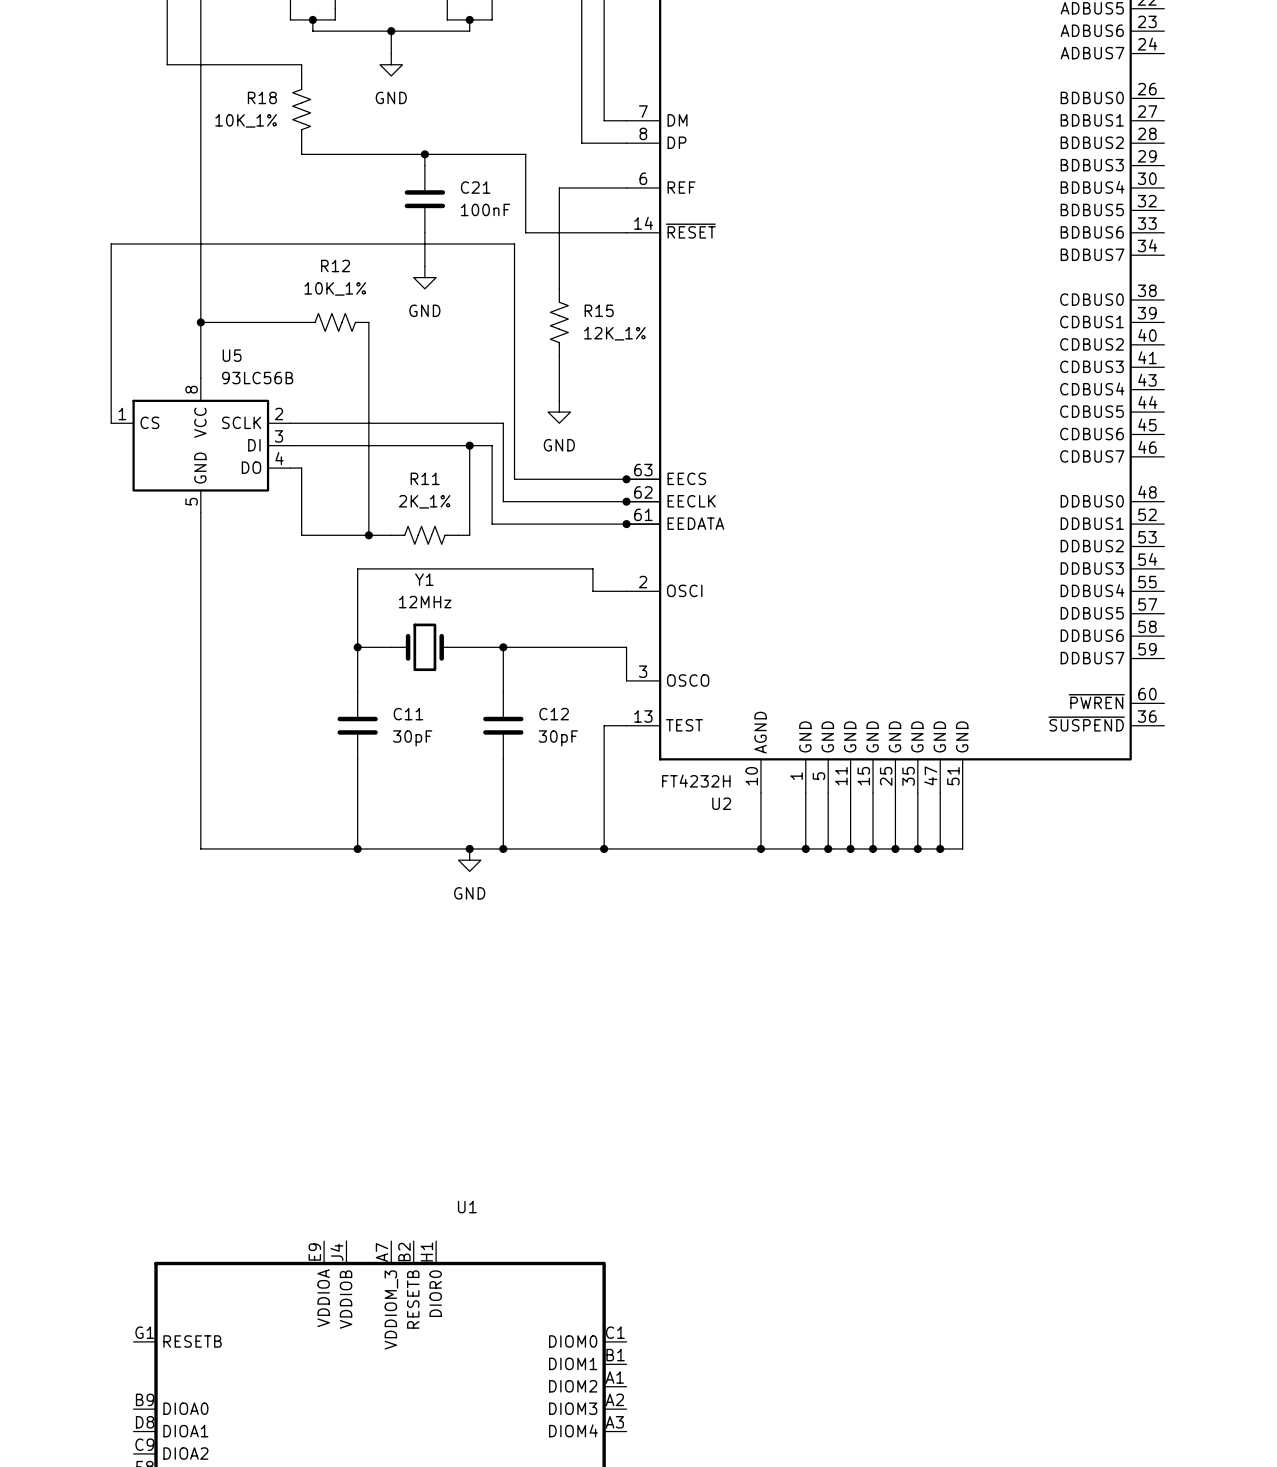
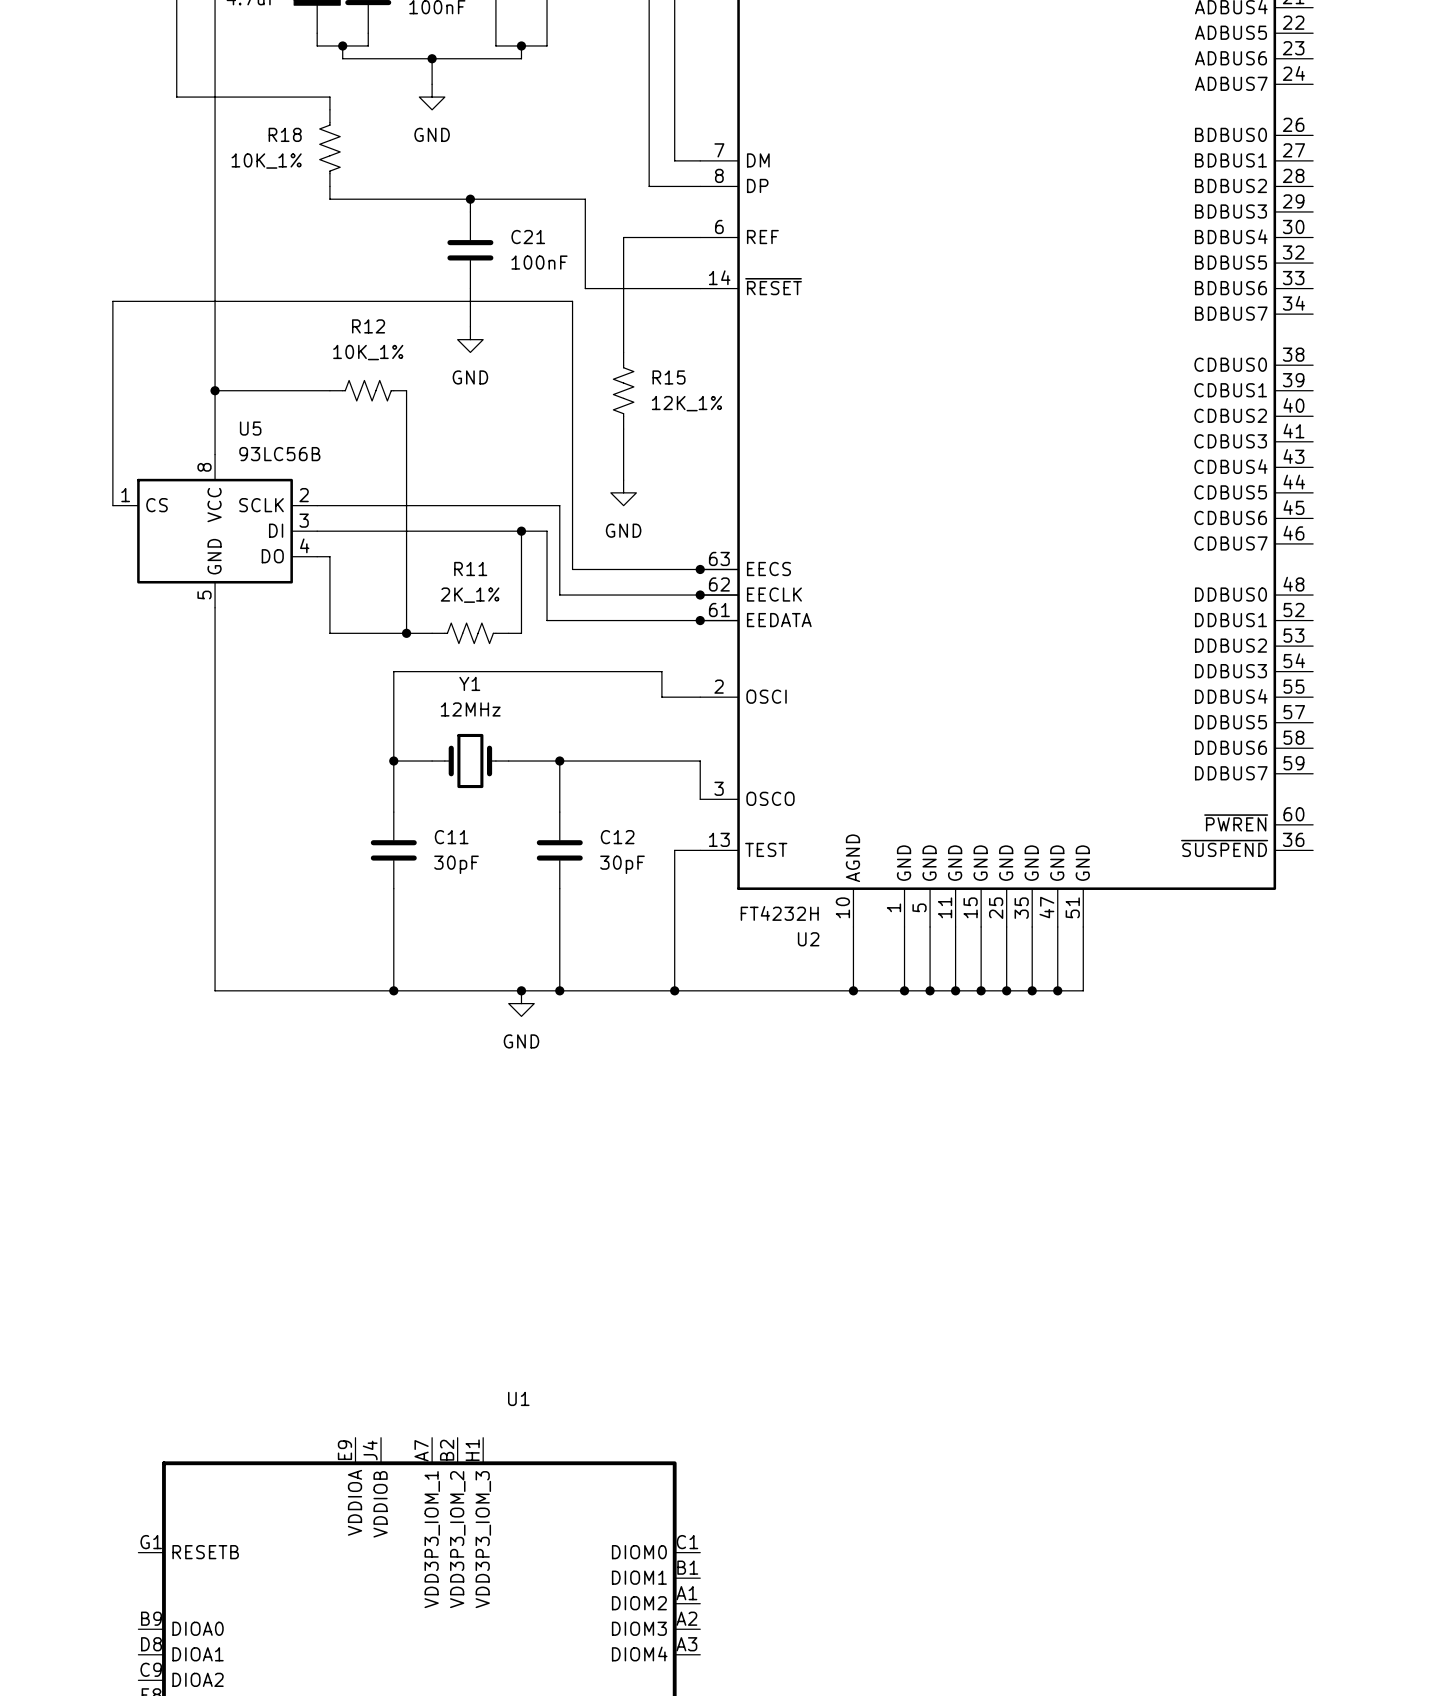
U1 pin name: DIOR0 (435, 1293) -> VDD3P3_IOM_3 (483, 1539)
U1 pin name: RESETB (413, 1299) -> VDD3P3_IOM_2 (457, 1539)
U1 pin name: VDDIOM_3 (391, 1309) -> VDD3P3_IOM_1 (432, 1539)

